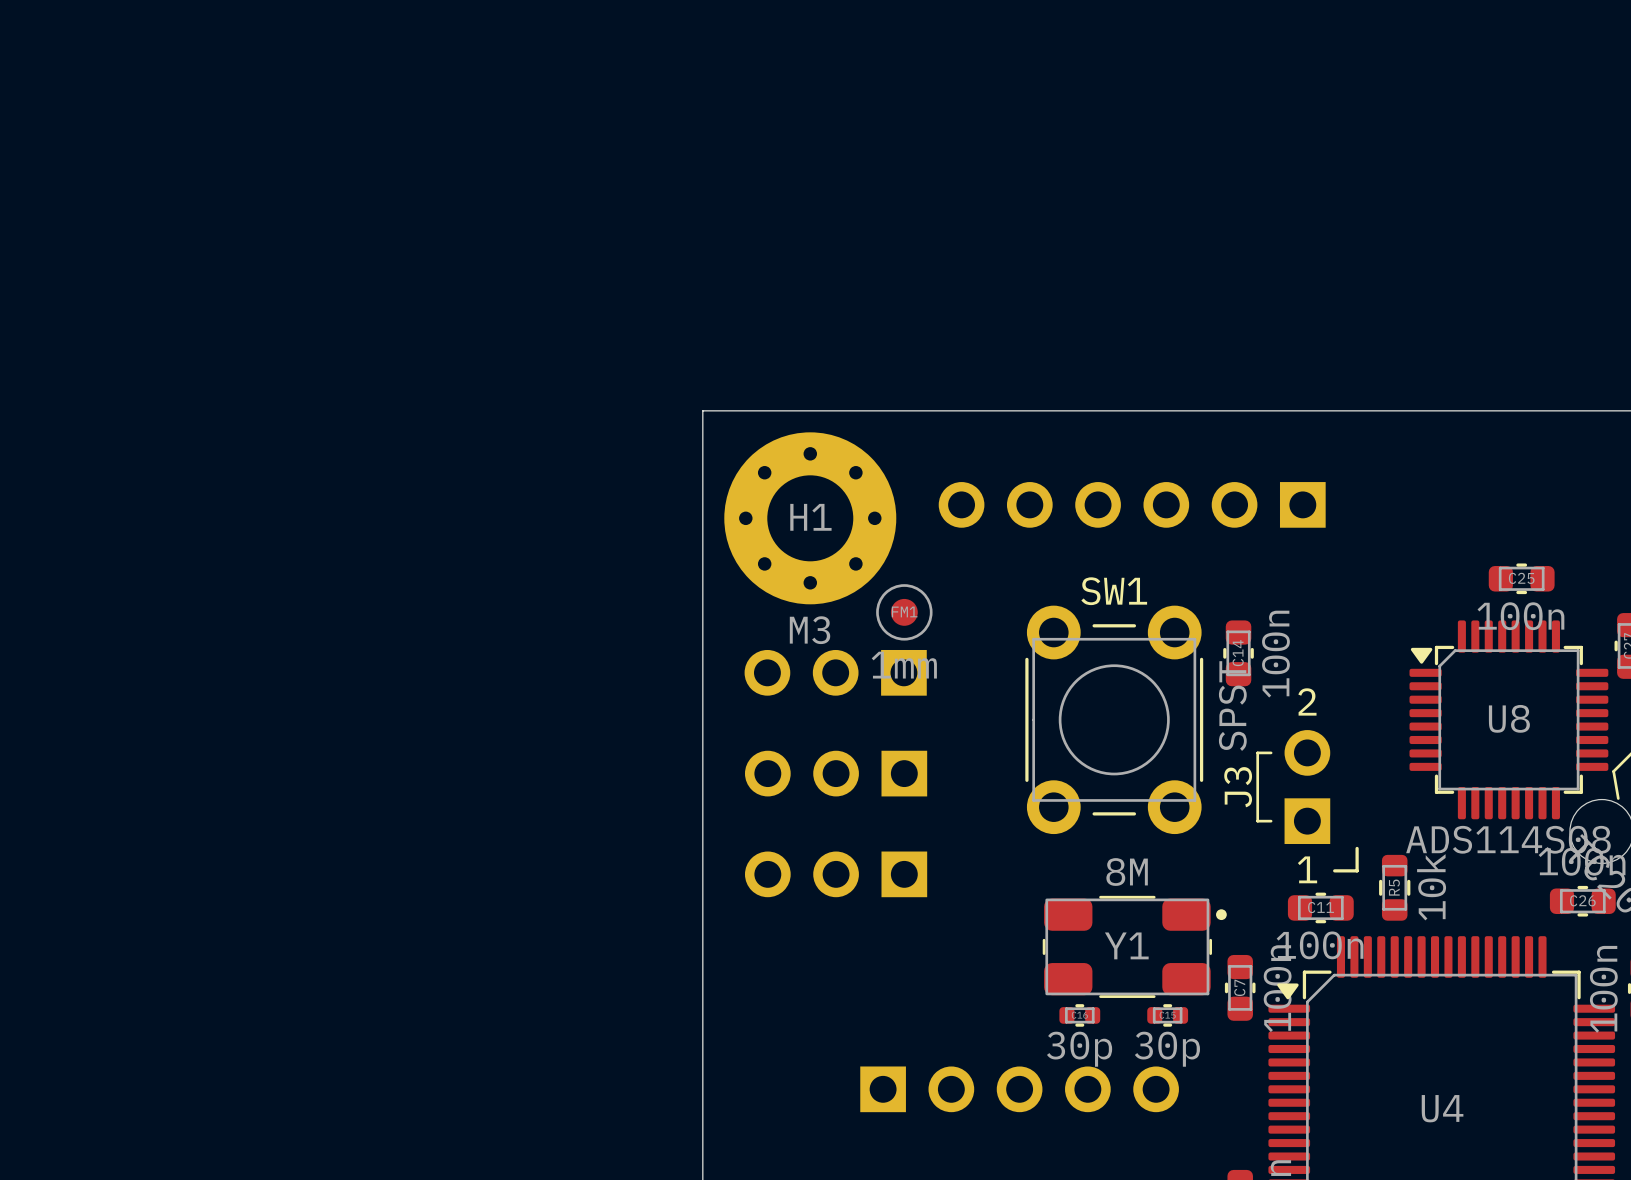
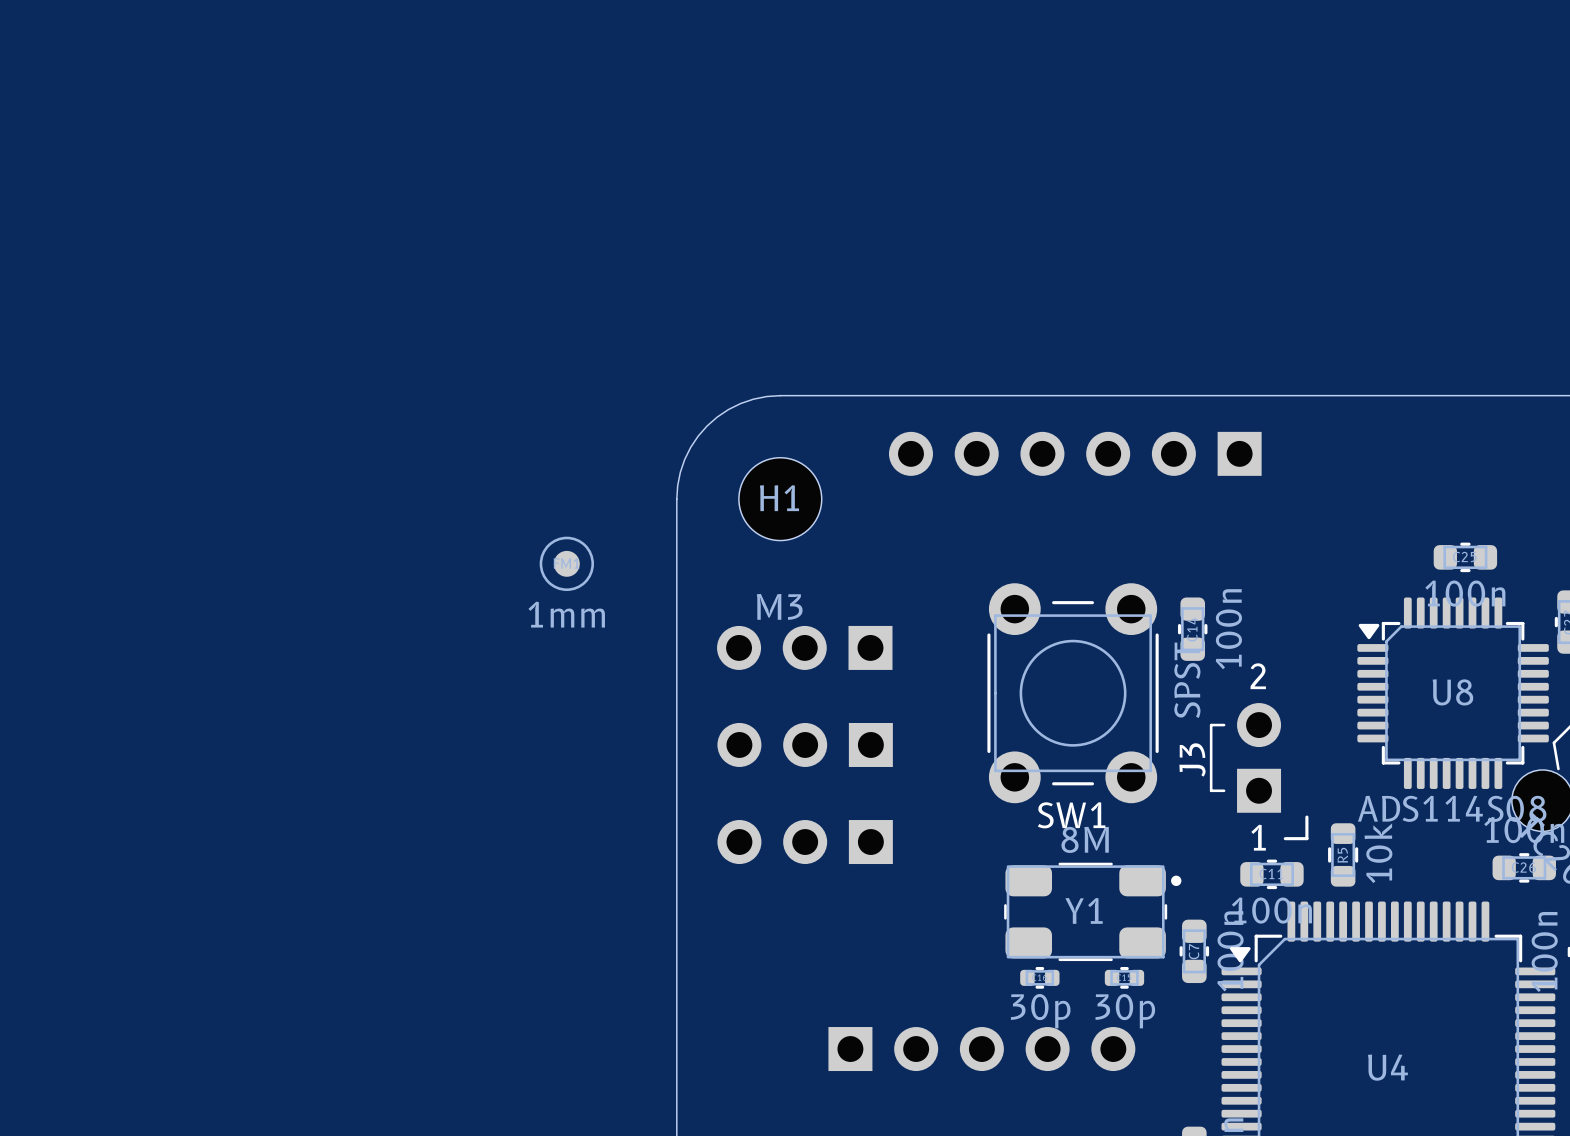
board edge: (810, 410) (702, 410) (702, 518) -> (780, 395) (766, 396) (740, 403) (728, 409) (707, 425) (698, 436) (684, 459) (677, 485) (676, 499)
H1 footprint: [724, 432, 897, 605] -> [738, 457, 822, 541]
part position: (1132, 504) -> (1075, 453)
SW1 name position: SW1 (1114, 591) -> SW1 (1071, 815)
FM1 position: (904, 612) -> (566, 563)

